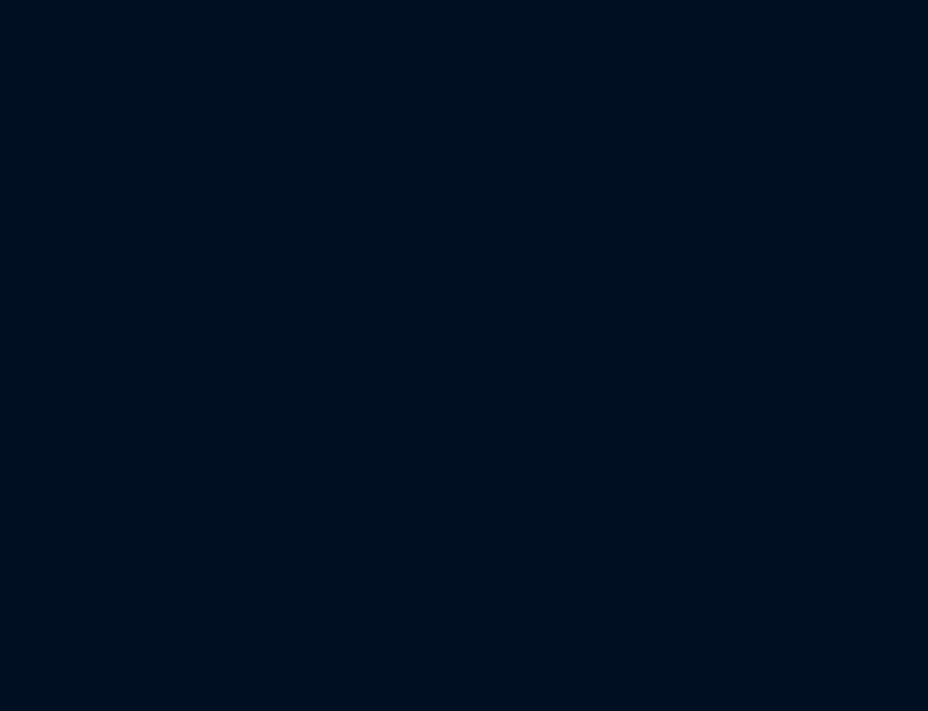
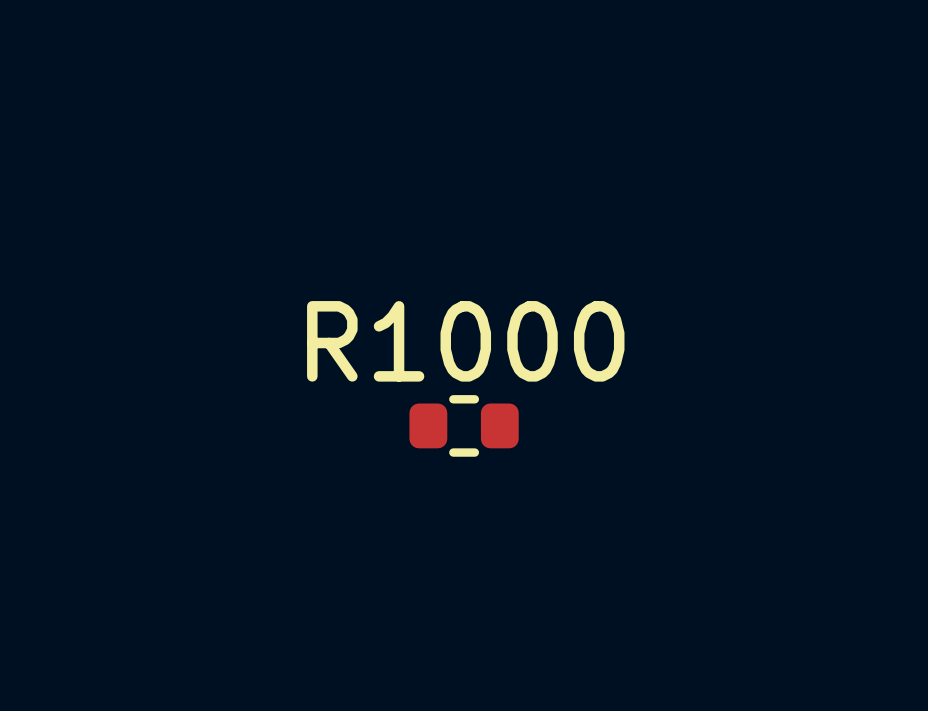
R1000: none -> (464, 425)

